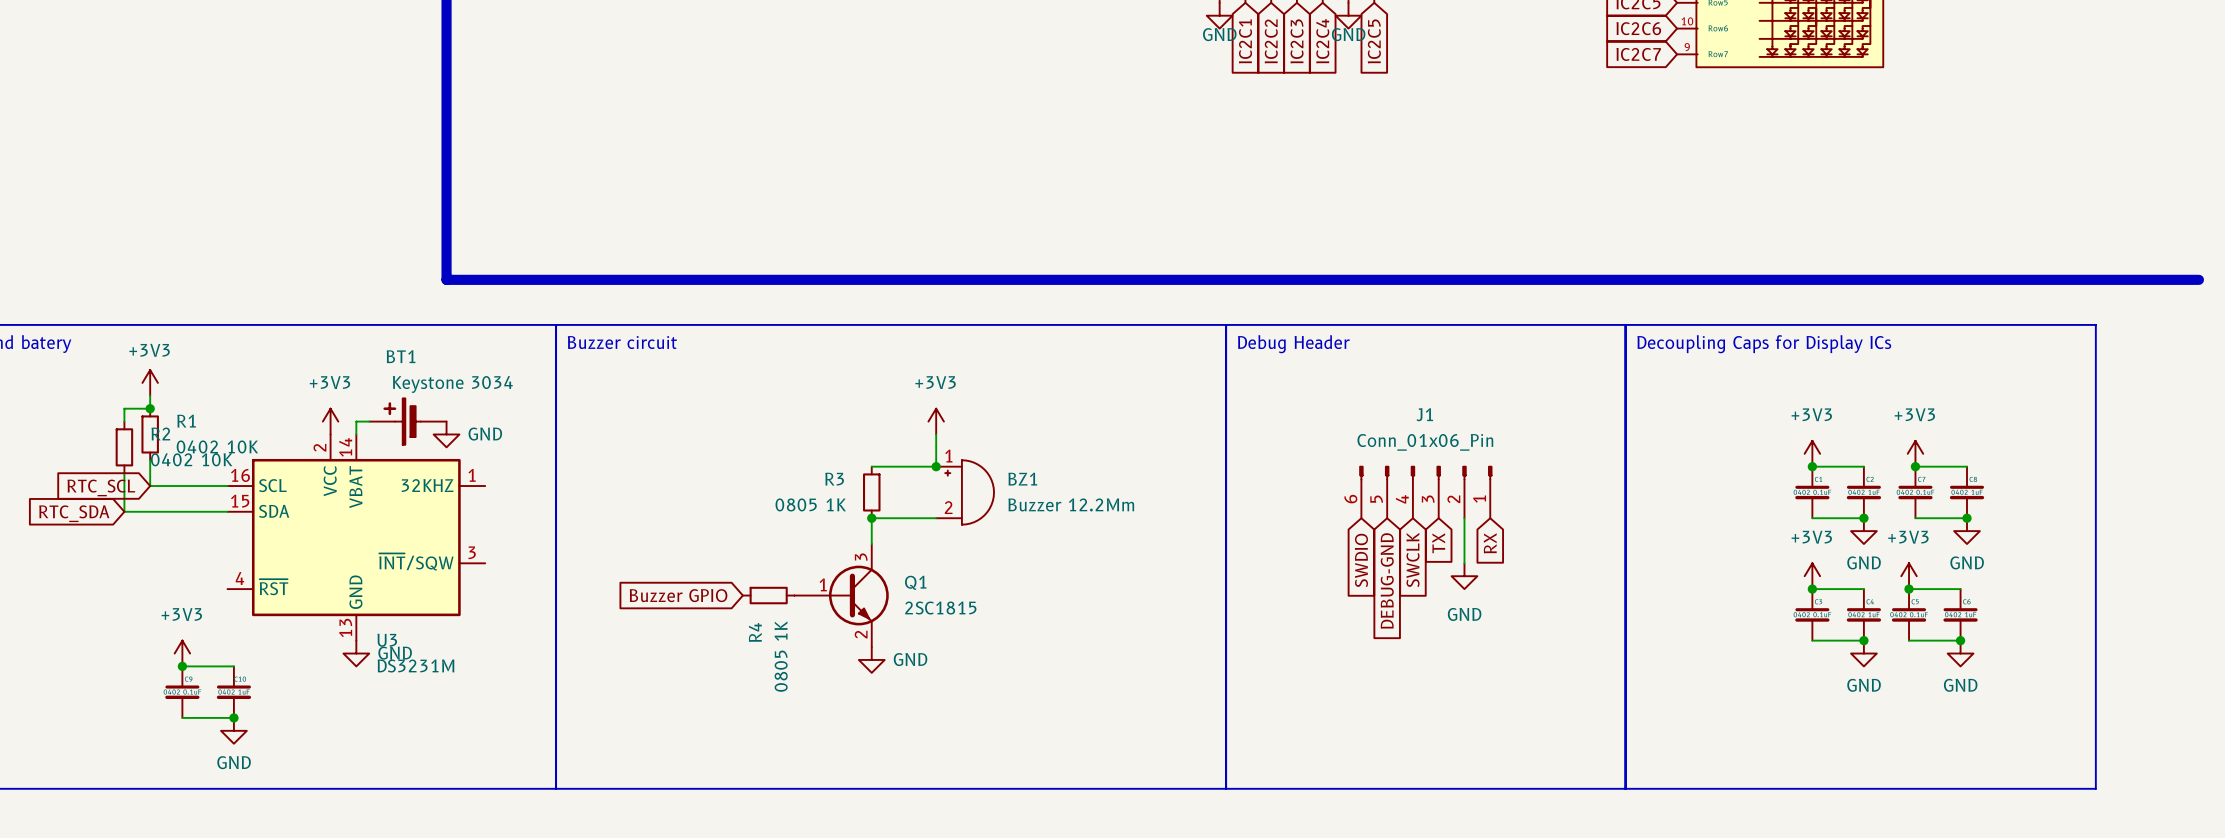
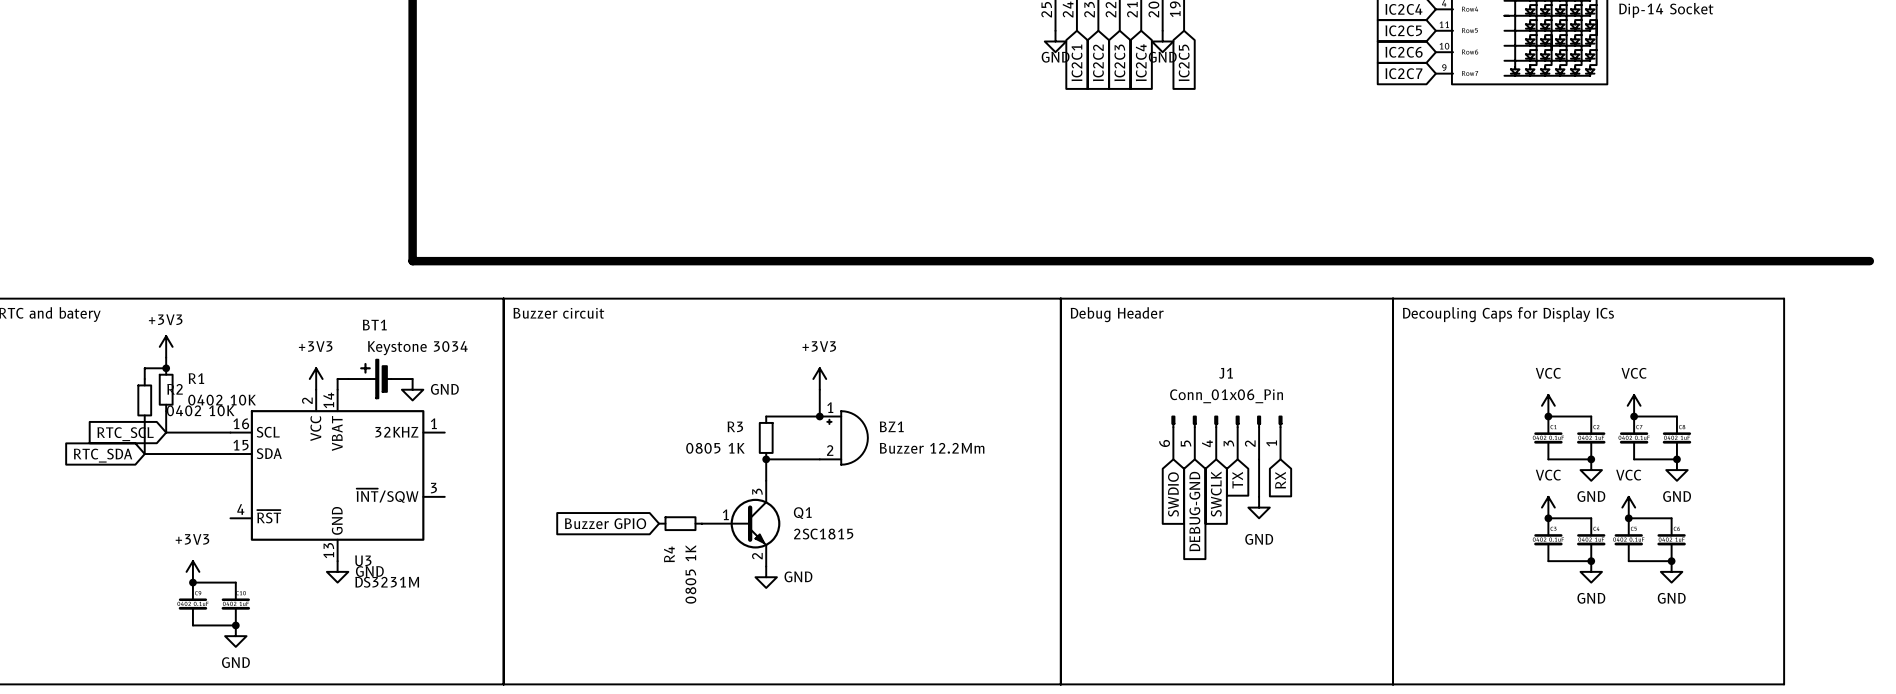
power symbol: +3V3 (1812, 453) -> VCC (1548, 405)
power symbol: +3V3 (1915, 453) -> VCC (1634, 405)
power symbol: +3V3 (1812, 576) -> VCC (1548, 507)
power symbol: +3V3 (1909, 576) -> VCC (1628, 507)

